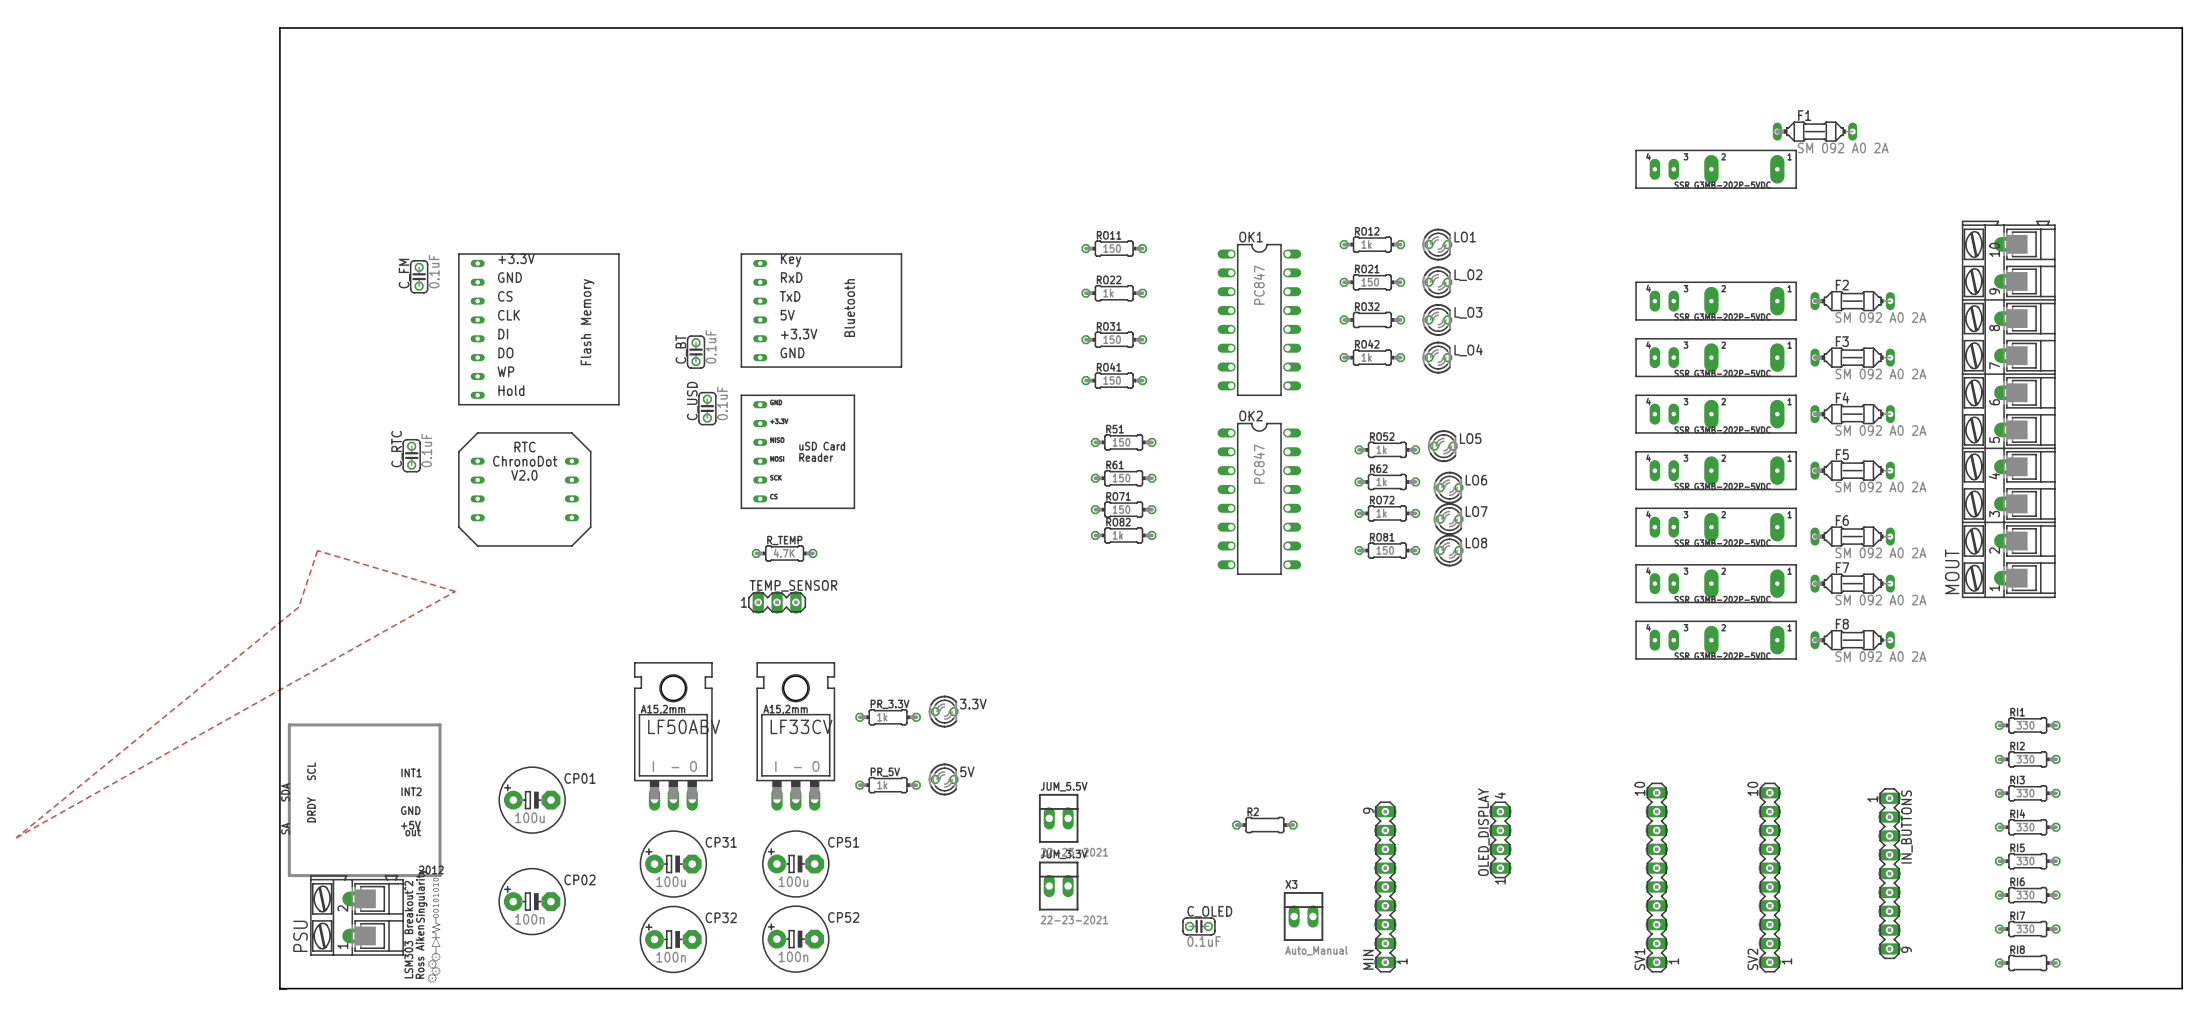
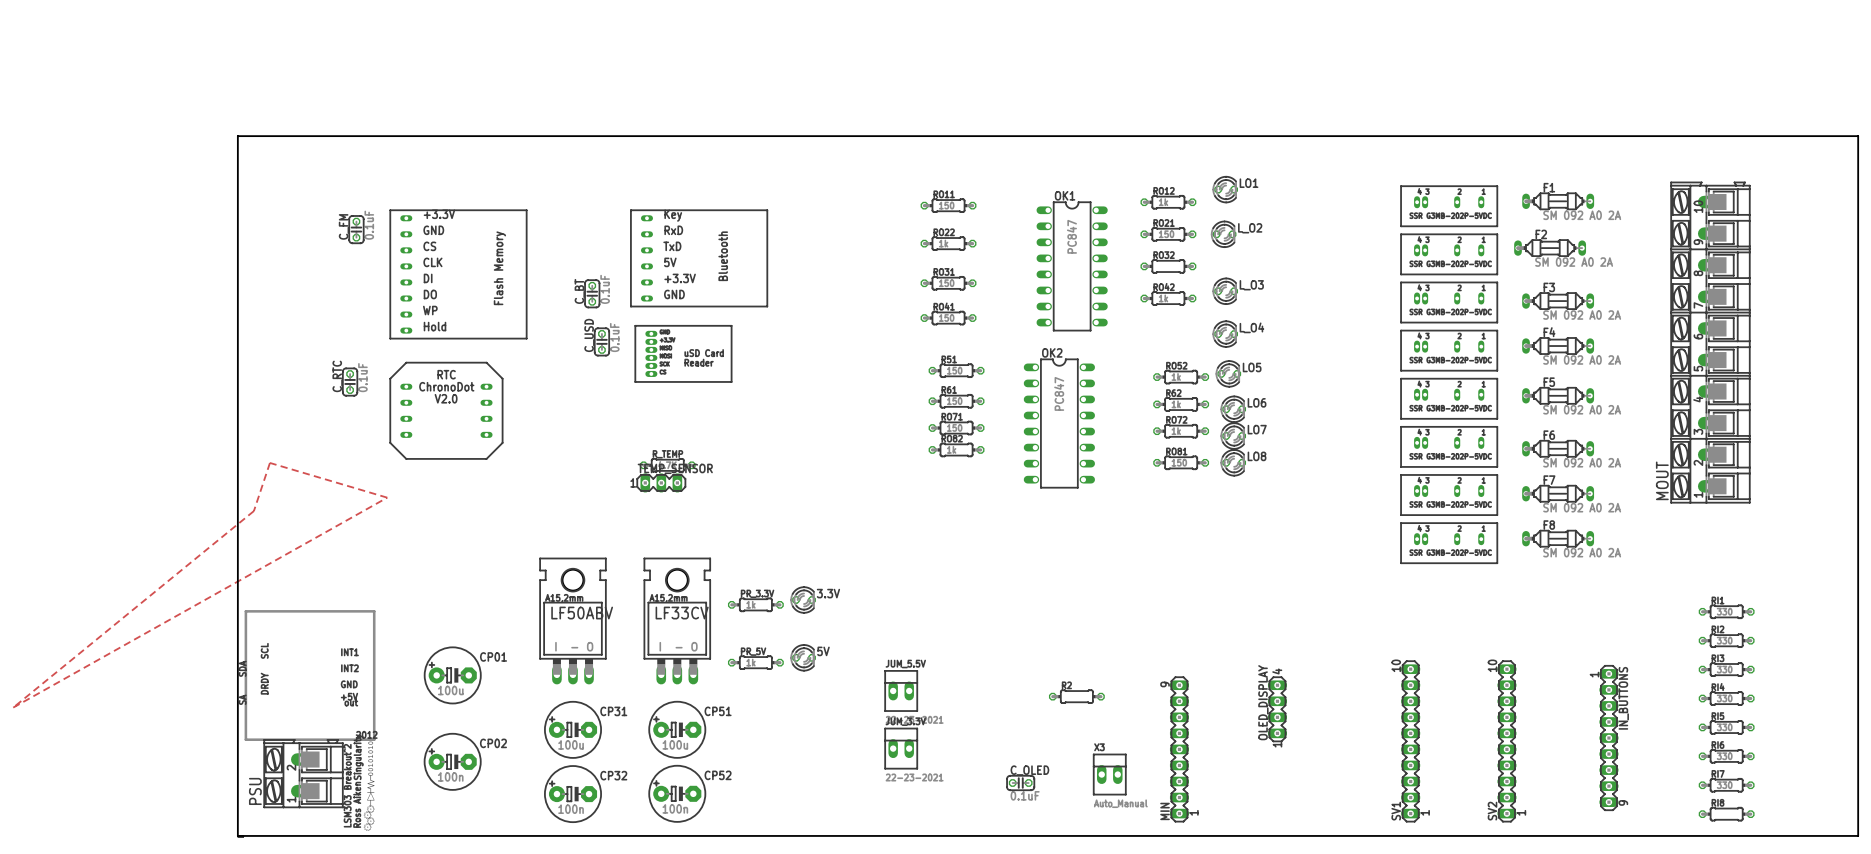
F1 position: (1815, 131) -> (1558, 201)
board edge: (279, 167) (279, 28) (2182, 28) (2182, 988) -> (237, 136) (1858, 136) (1858, 835)
part: (1716, 169) -> none
LO1 position: (1437, 244) -> (1225, 189)
part: none -> (1449, 206)
part: (1716, 301) -> none
F2 position: (1852, 301) -> (1550, 248)
part: none -> (1449, 254)
L_O3 position: (1437, 319) -> (1225, 291)
L_O4 position: (1437, 357) -> (1225, 334)
part: (1716, 357) -> none
F3 position: (1852, 357) -> (1558, 301)
part: none -> (1449, 302)
part: (1716, 414) -> none
F4 position: (1852, 414) -> (1558, 346)
part: none -> (1449, 350)
part: none -> (683, 353)
part: (797, 451) -> none
part: (1716, 470) -> none
F5 position: (1852, 470) -> (1558, 395)
part: none -> (1449, 398)
OK2 position: (1259, 498) -> (1059, 423)
part: (1716, 527) -> none
part: none -> (1449, 446)
F6 position: (1852, 536) -> (1558, 448)
part: (1716, 583) -> none
F7 position: (1852, 583) -> (1558, 493)
part: none -> (1449, 495)
TEMP_SENSOR position: (777, 602) -> (661, 482)
part: (1716, 640) -> none
F8 position: (1852, 640) -> (1558, 538)
part: none -> (1449, 543)

